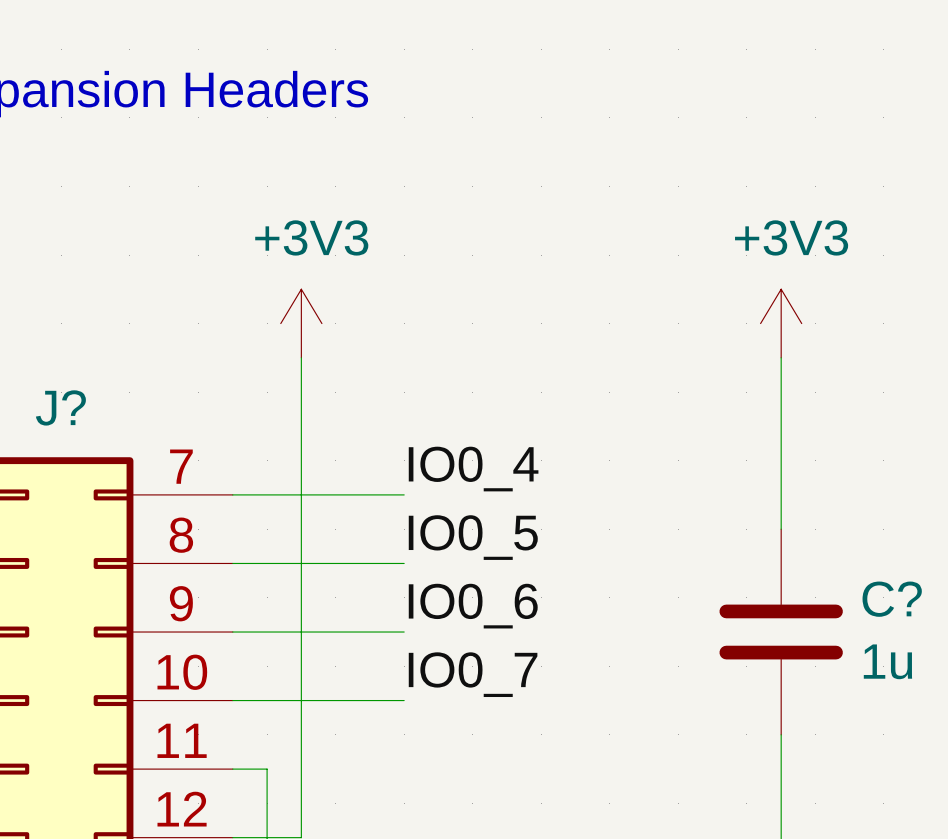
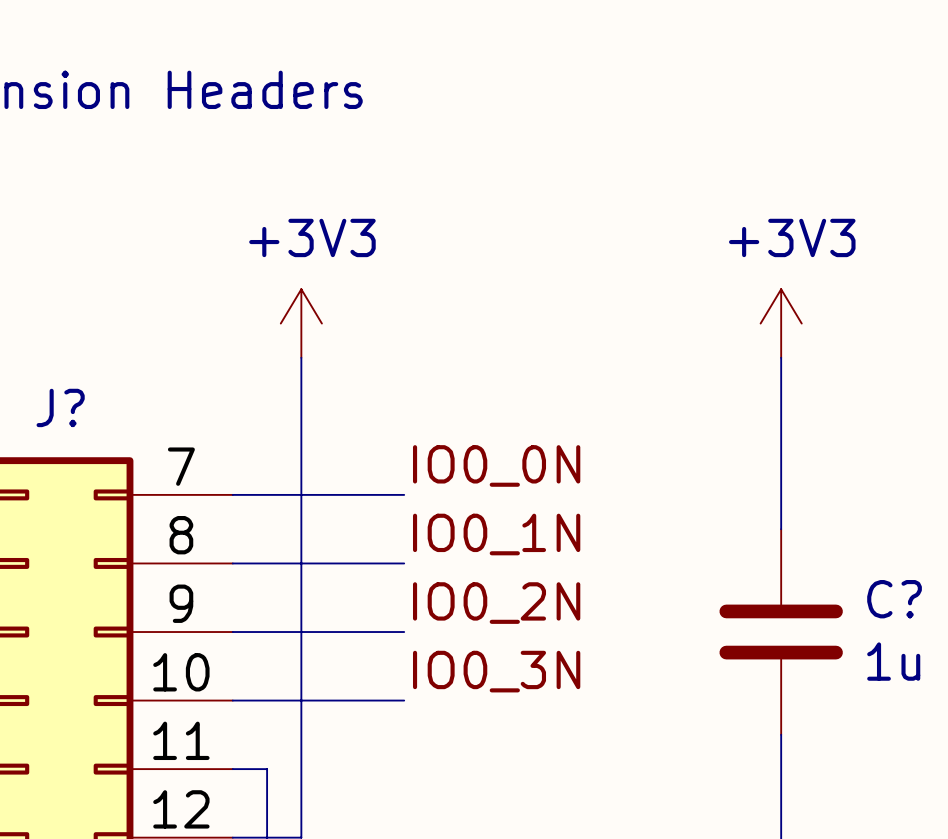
label: IO0_4 (473, 469) -> IO0_0N (496, 465)
label: IO0_5 (473, 537) -> IO0_1N (496, 534)
label: IO0_6 (473, 606) -> IO0_2N (496, 603)
label: IO0_7 (473, 674) -> IO0_3N (496, 671)

